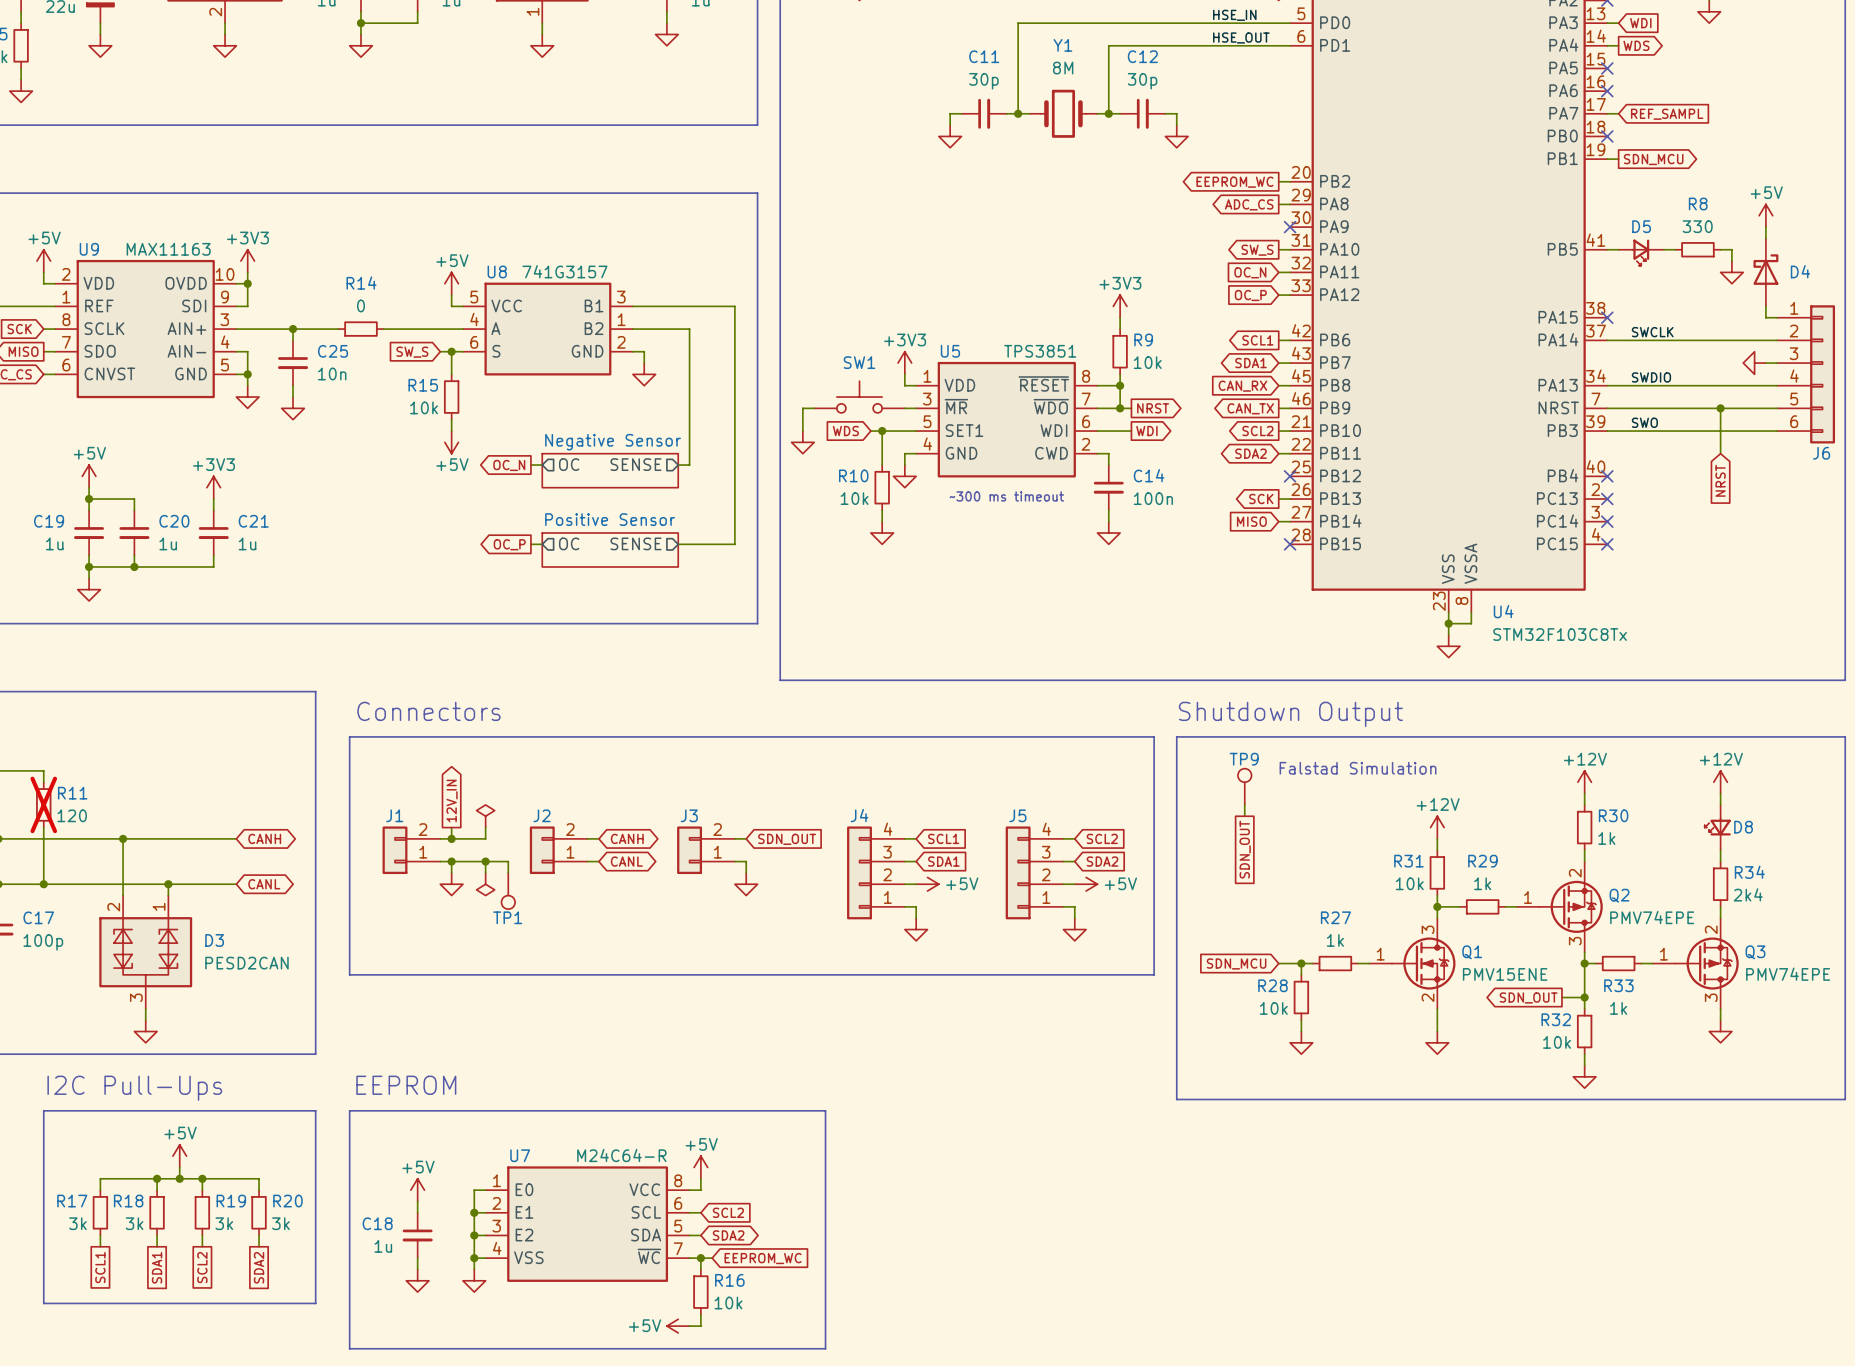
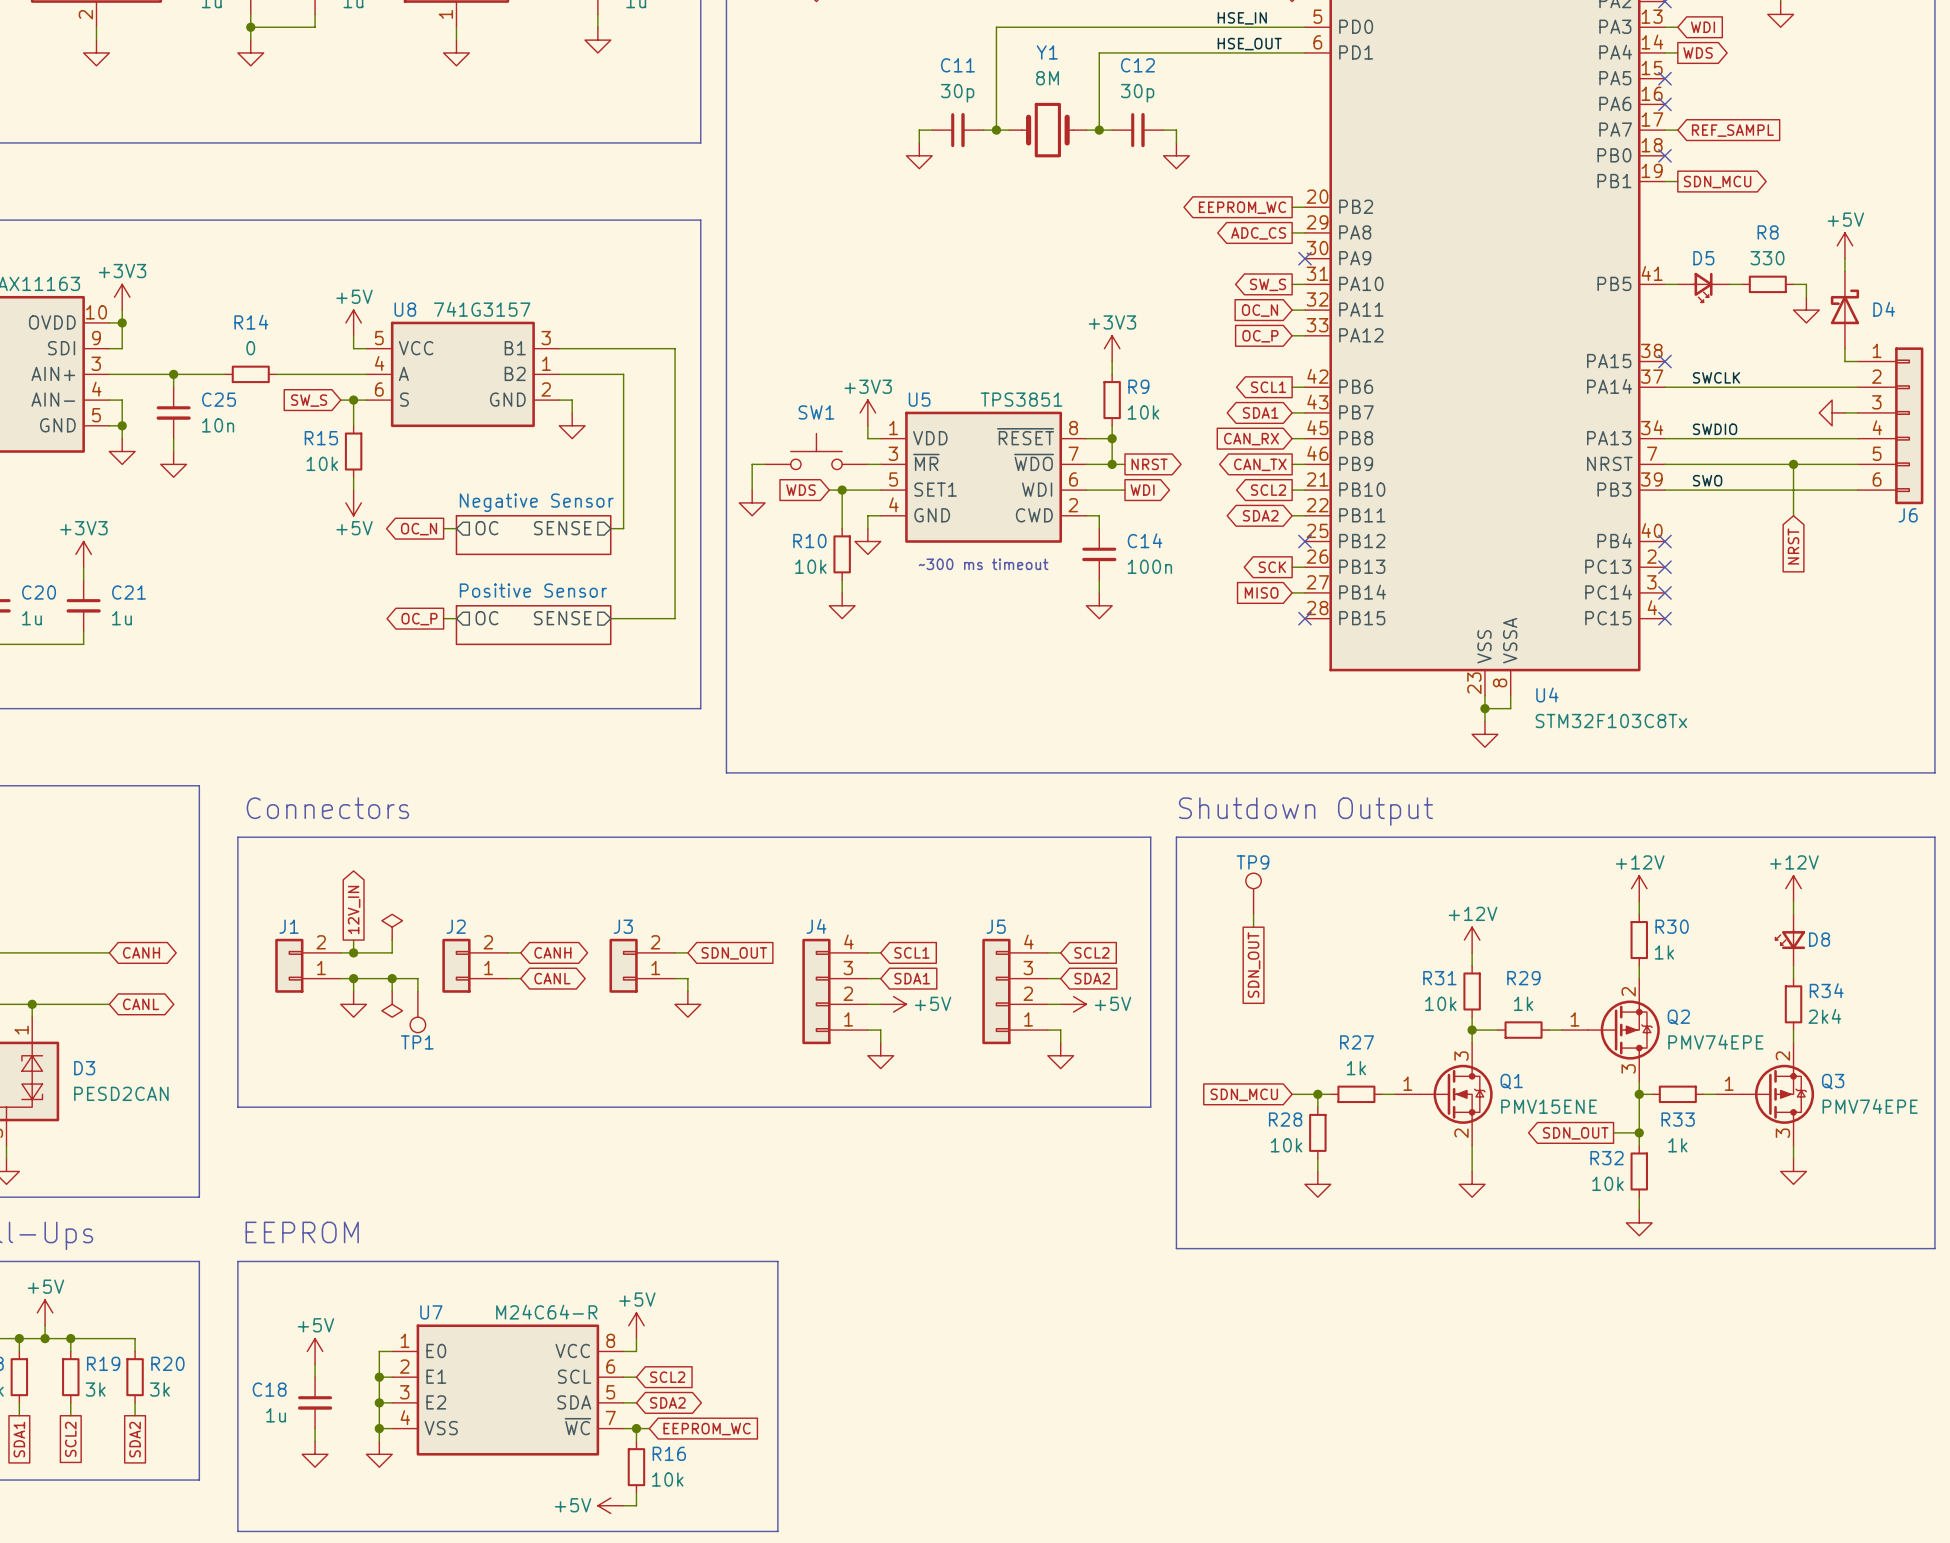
text: Falstad Simulation (1358, 768) -> none

